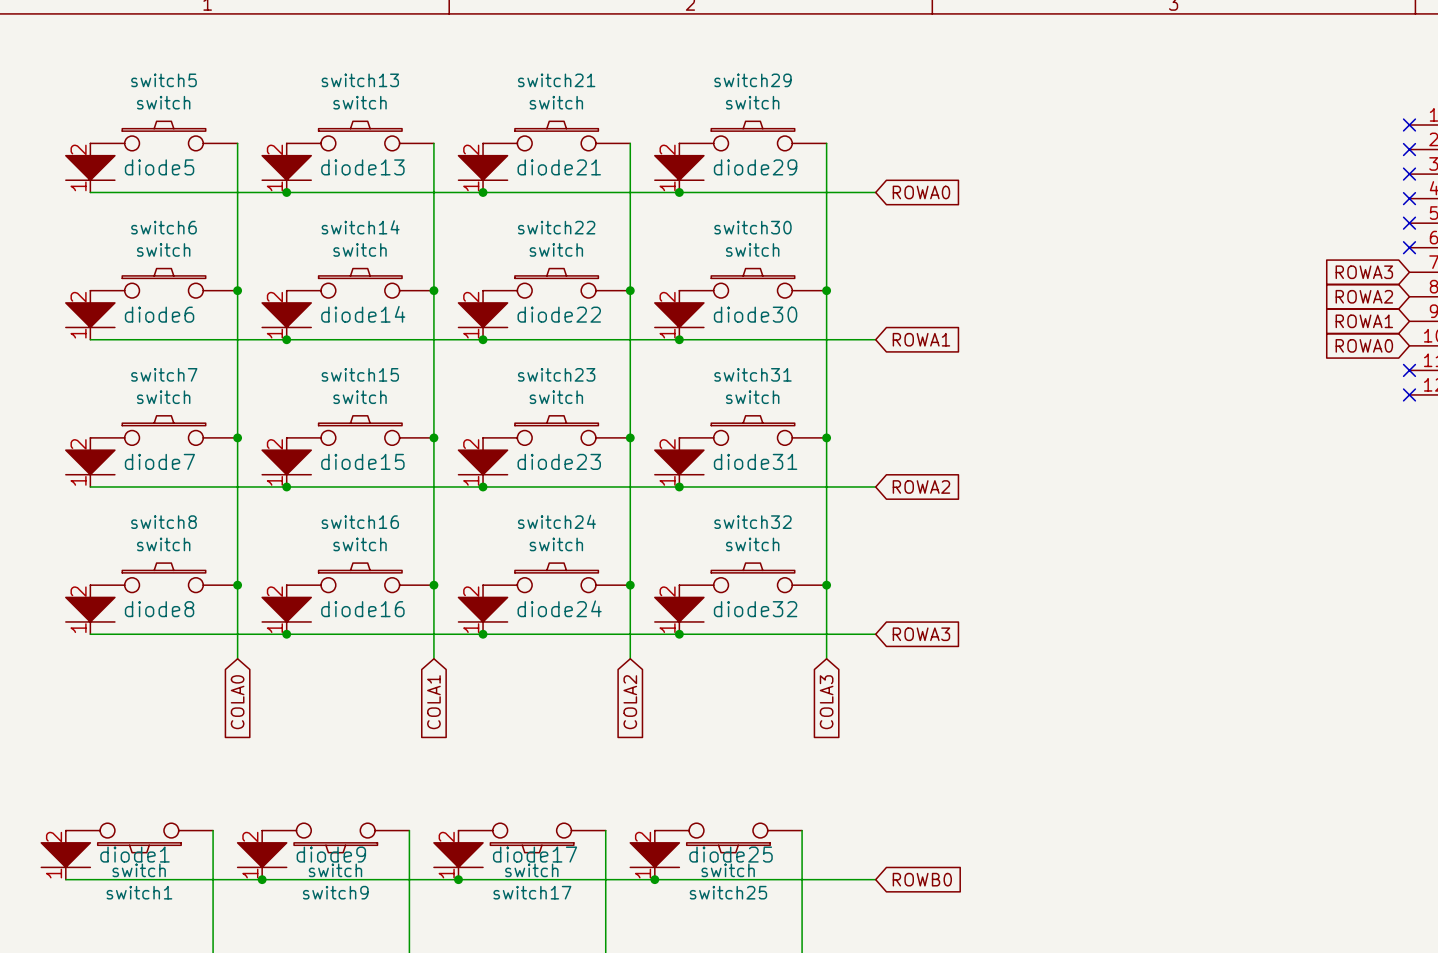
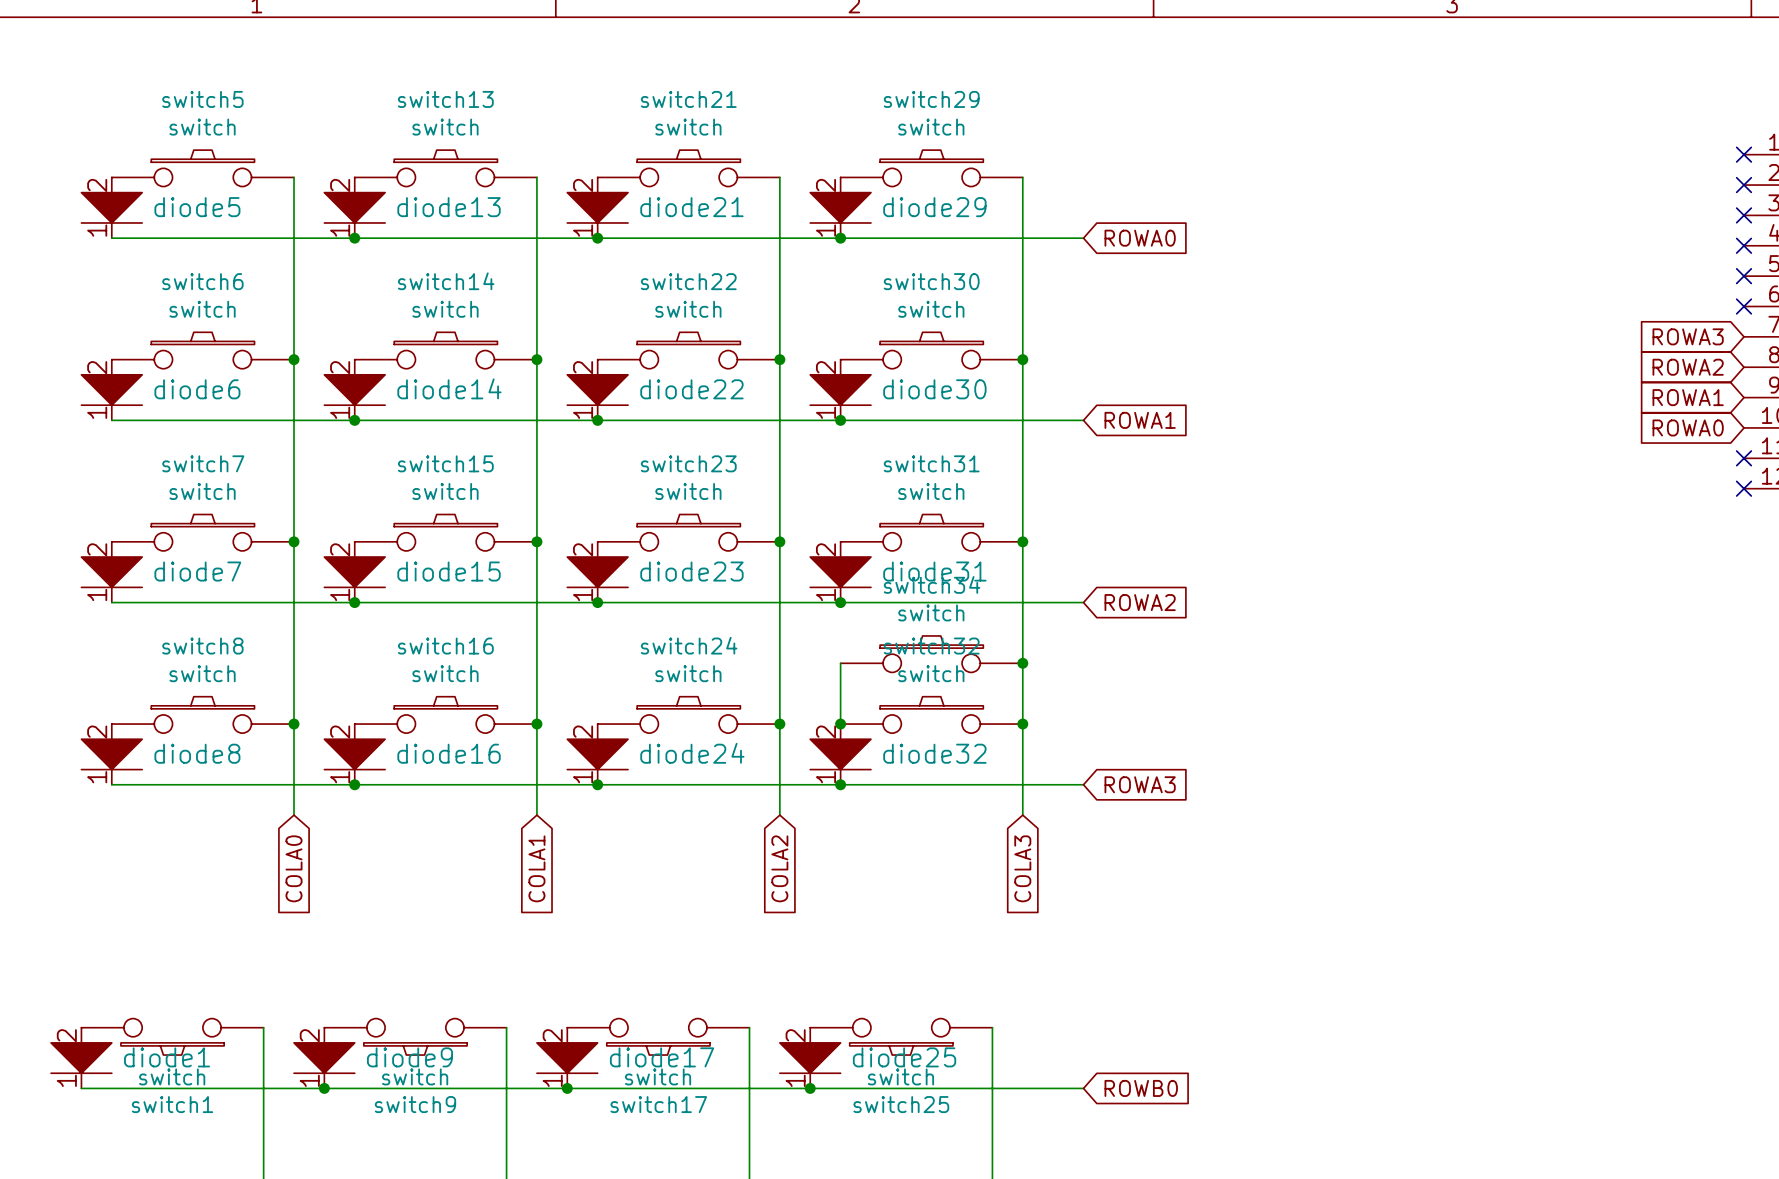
switch34: none -> switch (931, 654)
wire: none -> (840, 663) (840, 724)
junction: none -> (1022, 663)
junction: none -> (840, 724)

